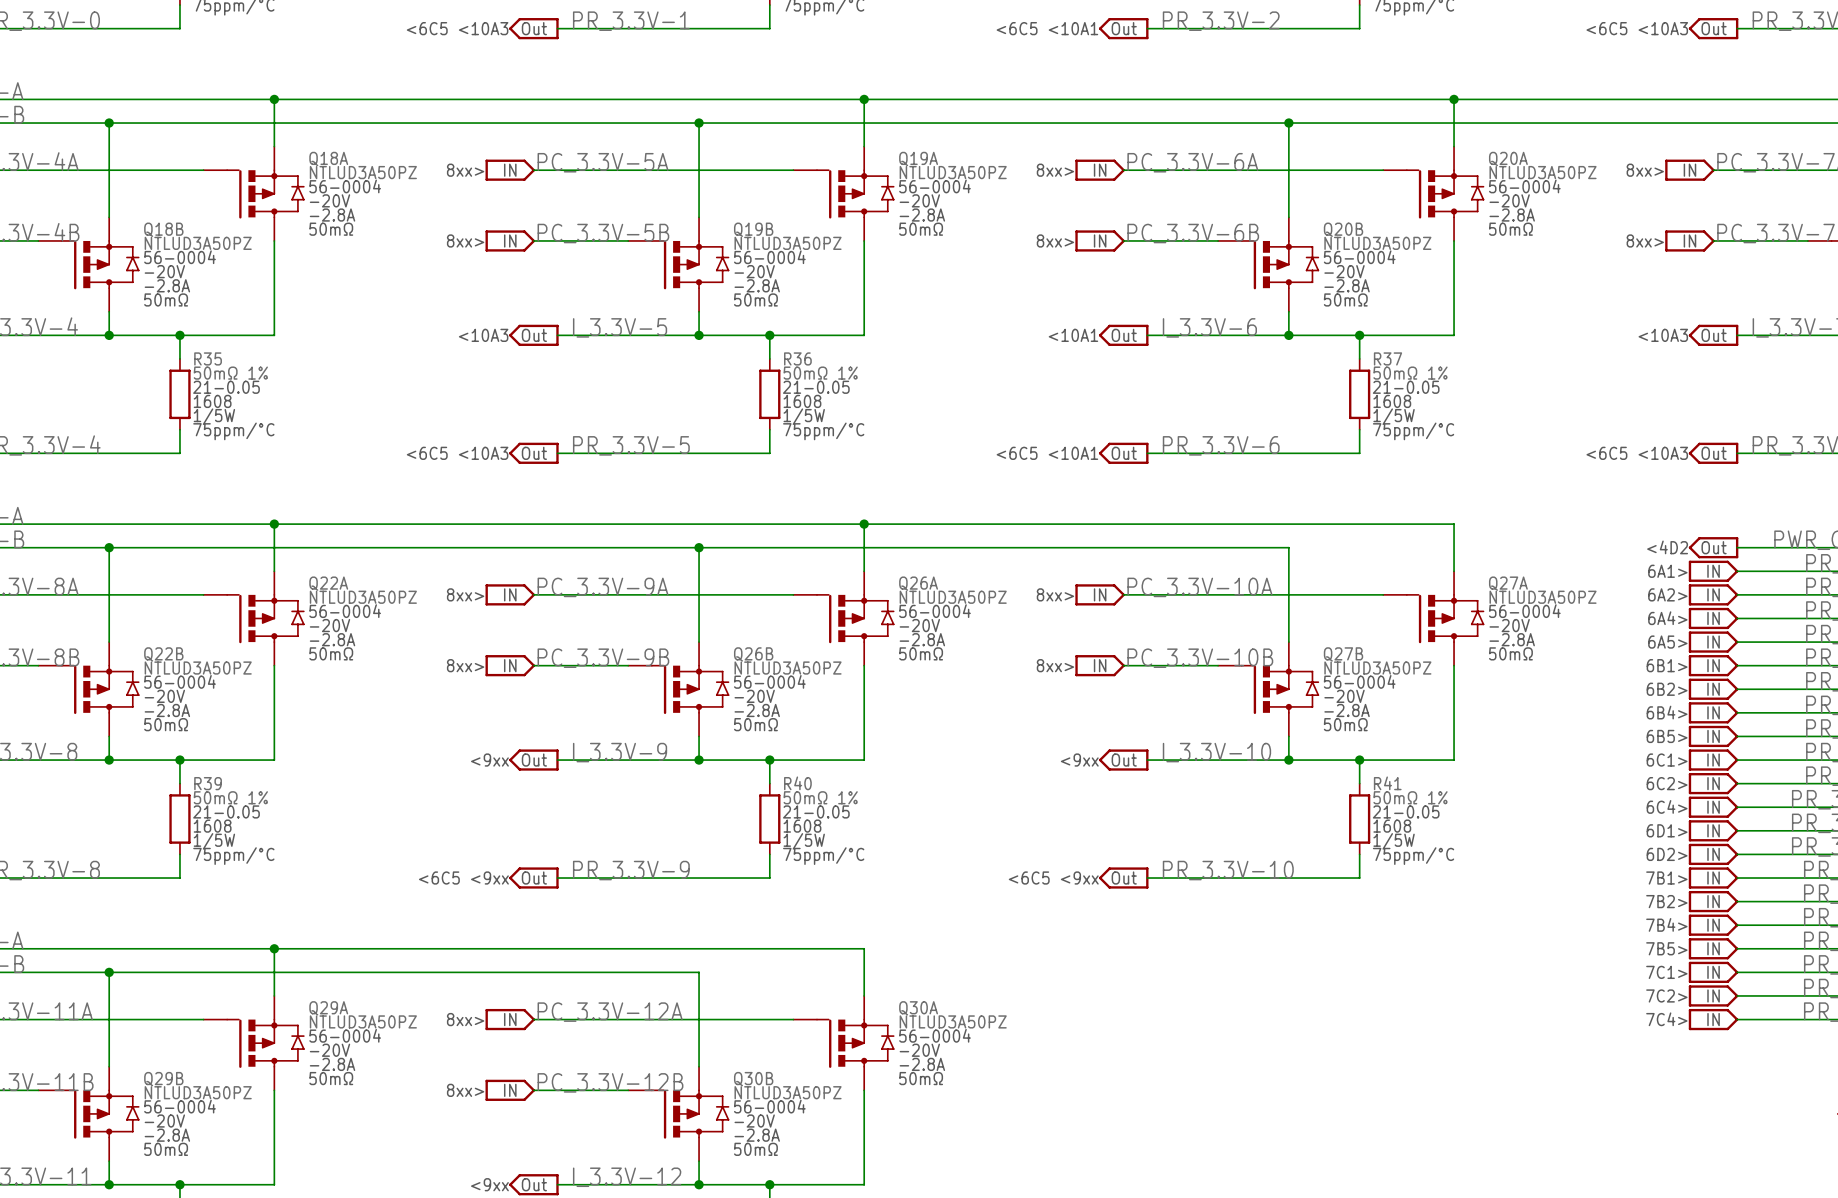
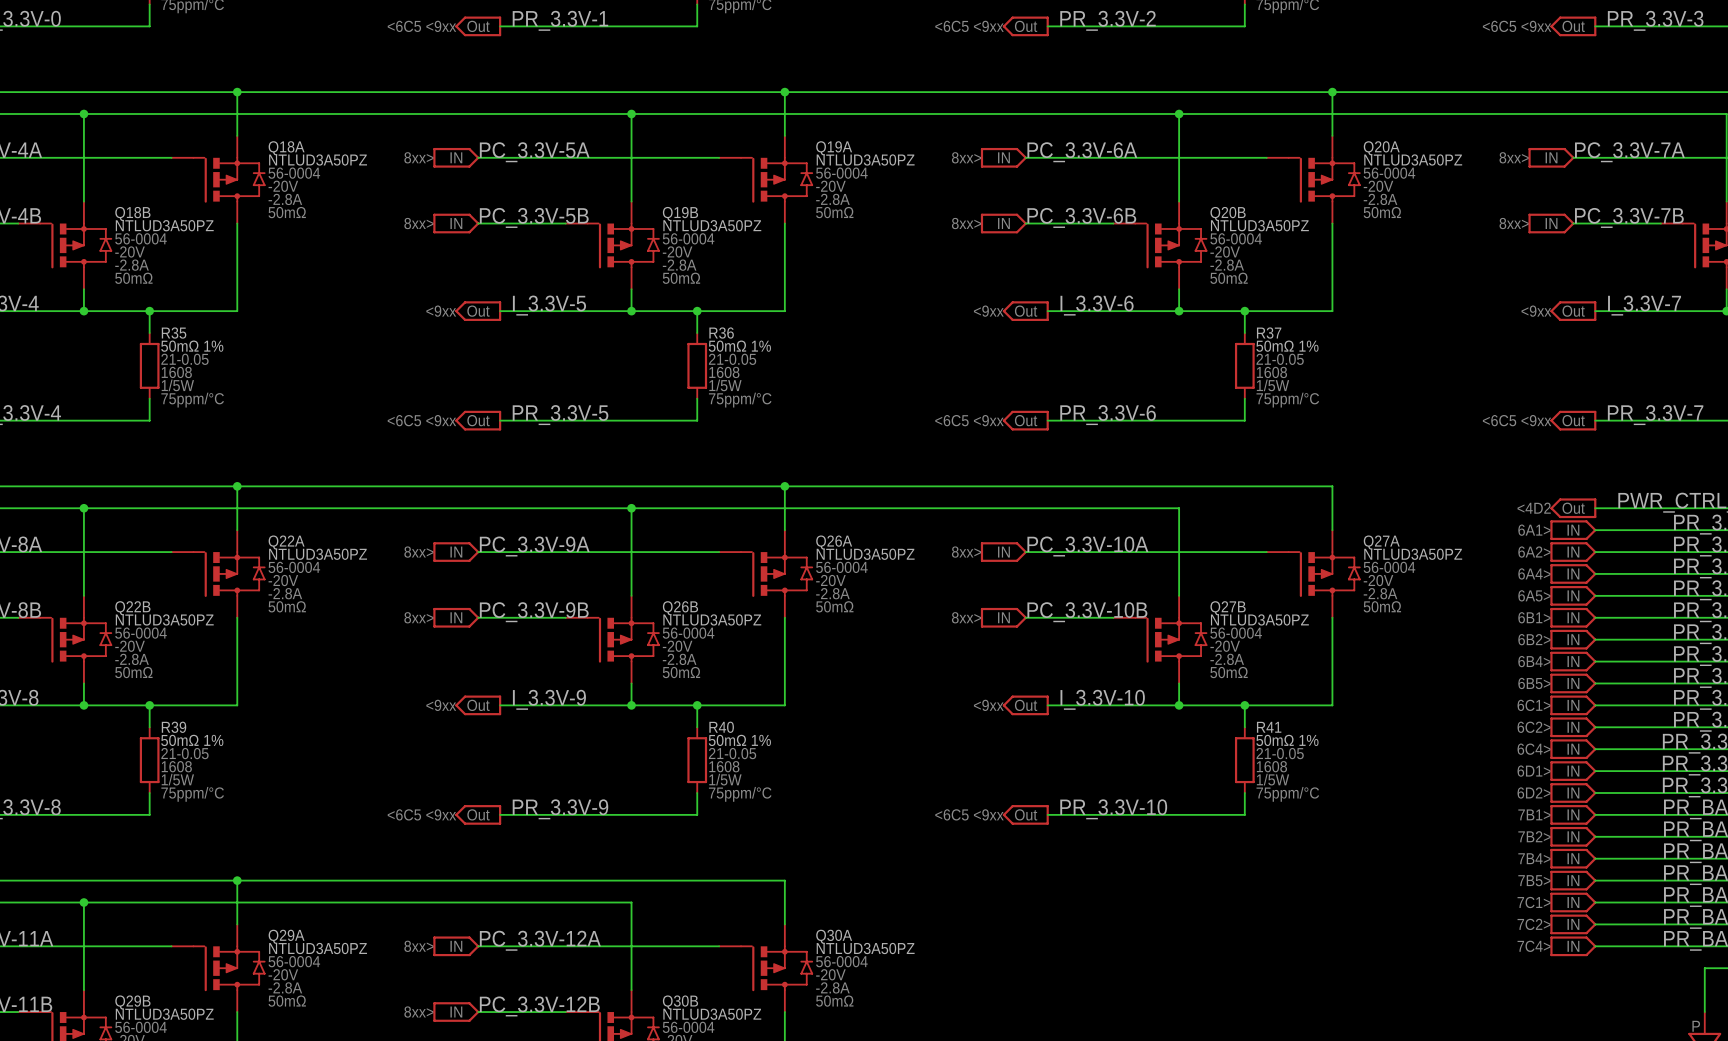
text: <6C5 <10A3 (457, 28) -> <6C5 <9xx (421, 26)
text: <6C5 <10A1 (1047, 28) -> <6C5 <9xx (969, 26)
text: <6C5 <10A3 (1637, 28) -> <6C5 <9xx (1517, 26)
text: <10A3 (483, 335) -> <9xx (441, 311)
text: <10A1 (1073, 335) -> <9xx (988, 311)
text: <10A3 (1663, 335) -> <9xx (1536, 311)
text: <6C5 <10A3 (457, 453) -> <6C5 <9xx (421, 420)
text: <6C5 <10A1 (1047, 453) -> <6C5 <9xx (969, 420)
text: <6C5 <10A3 (1637, 453) -> <6C5 <9xx (1517, 420)

